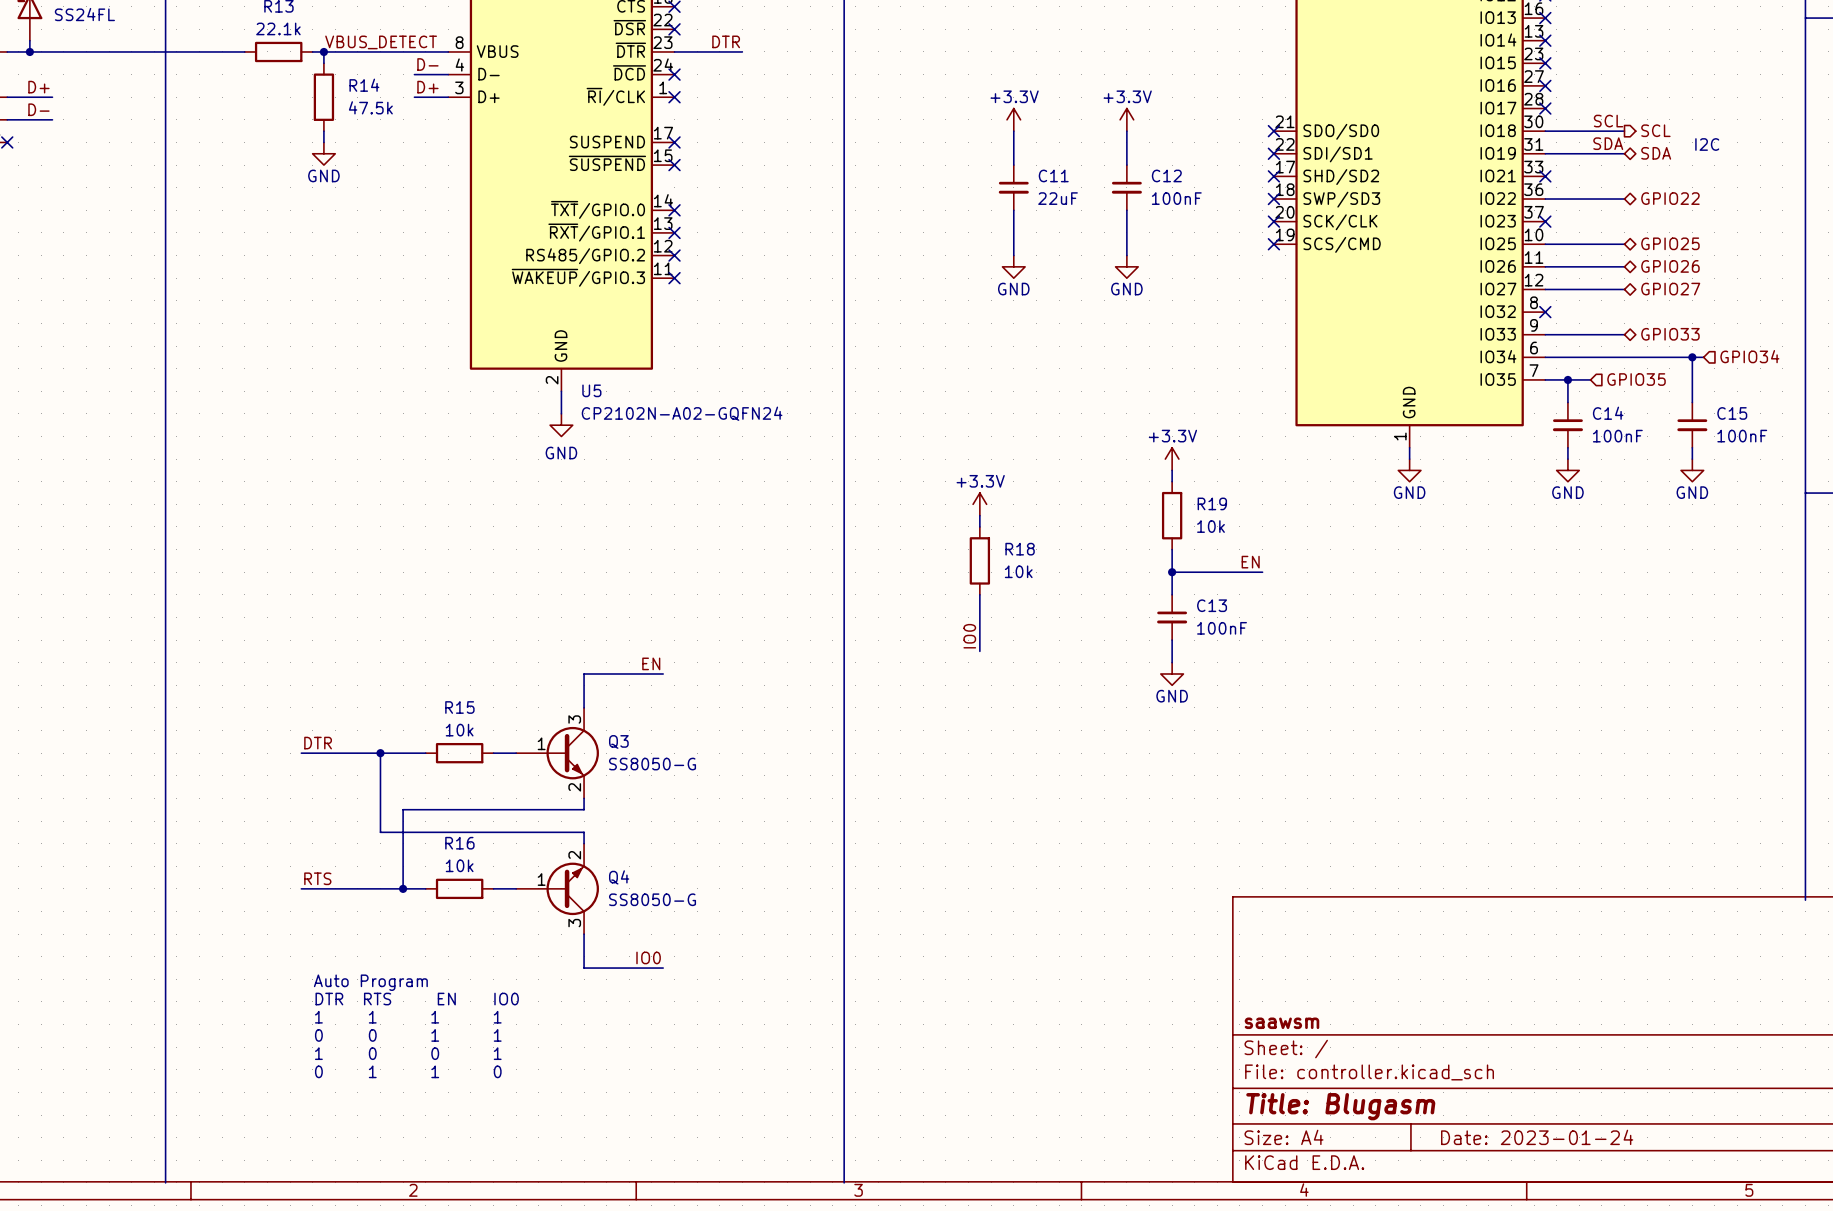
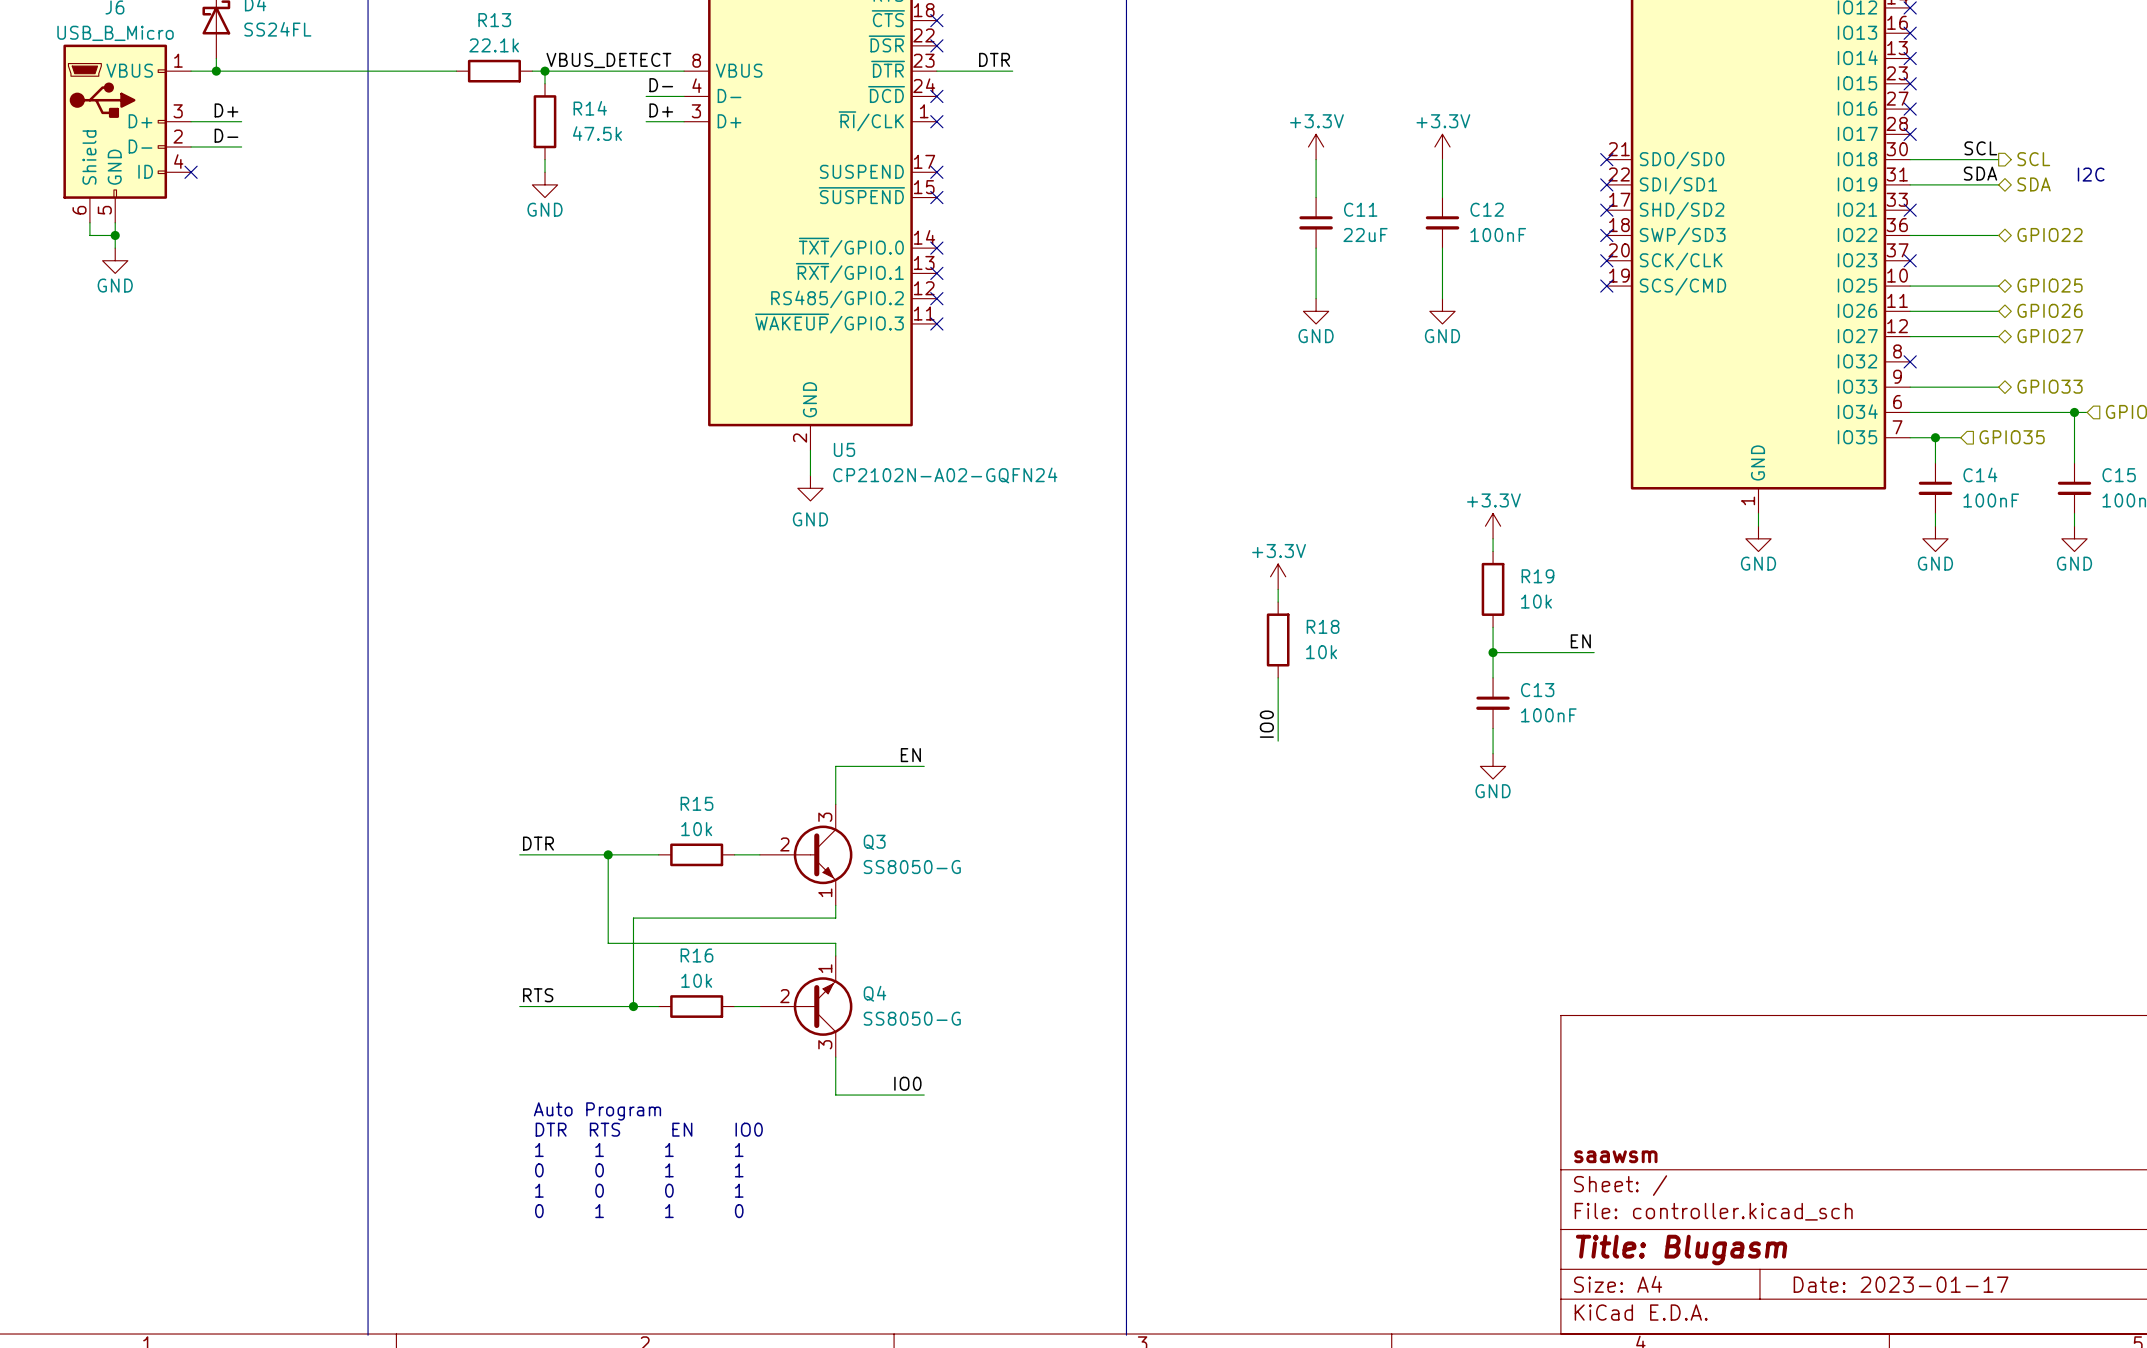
Q3 symbol: [516, 707, 599, 799] -> [759, 804, 853, 906]
Q4 symbol: [516, 843, 599, 935] -> [759, 955, 853, 1058]
title block: Date: 2023-01-24 (1537, 1137) -> Date: 2023-01-17 (1901, 1284)

